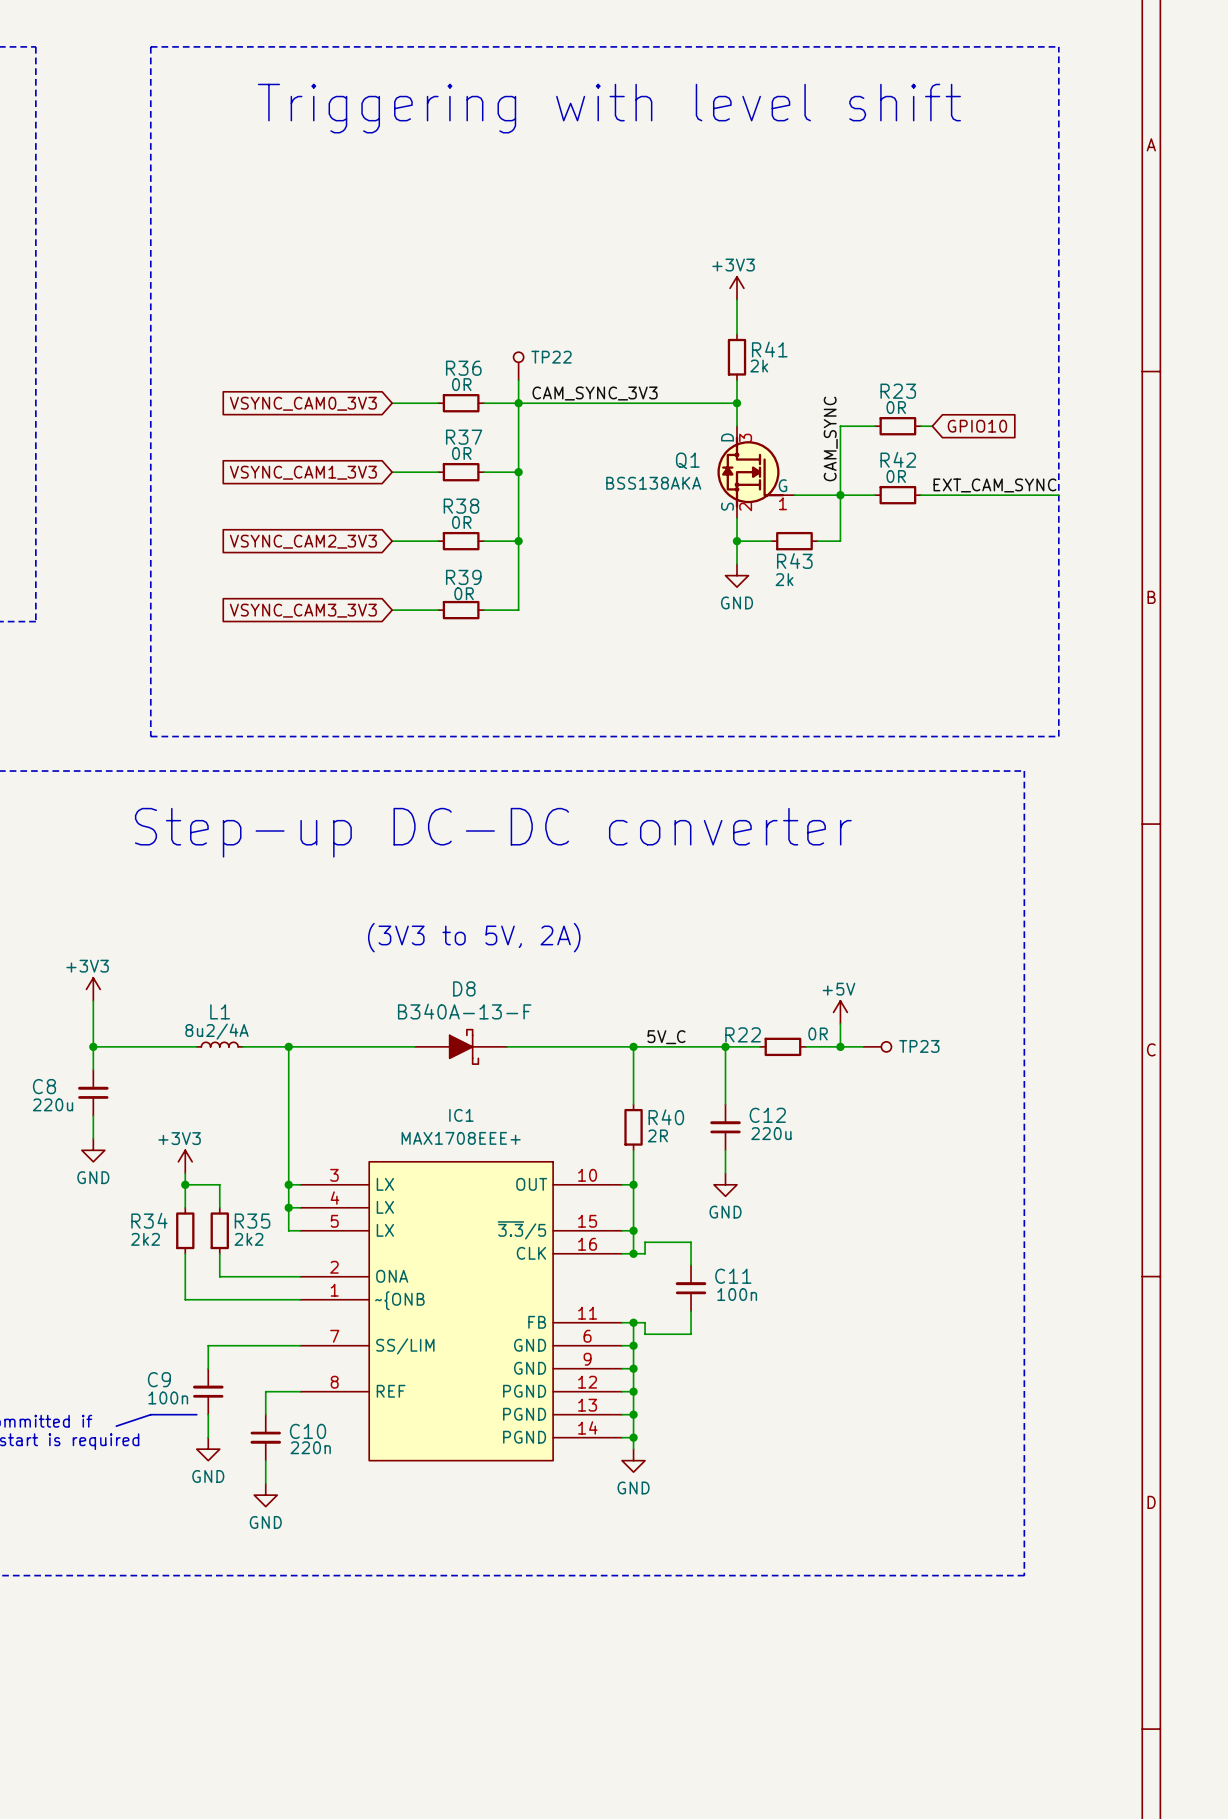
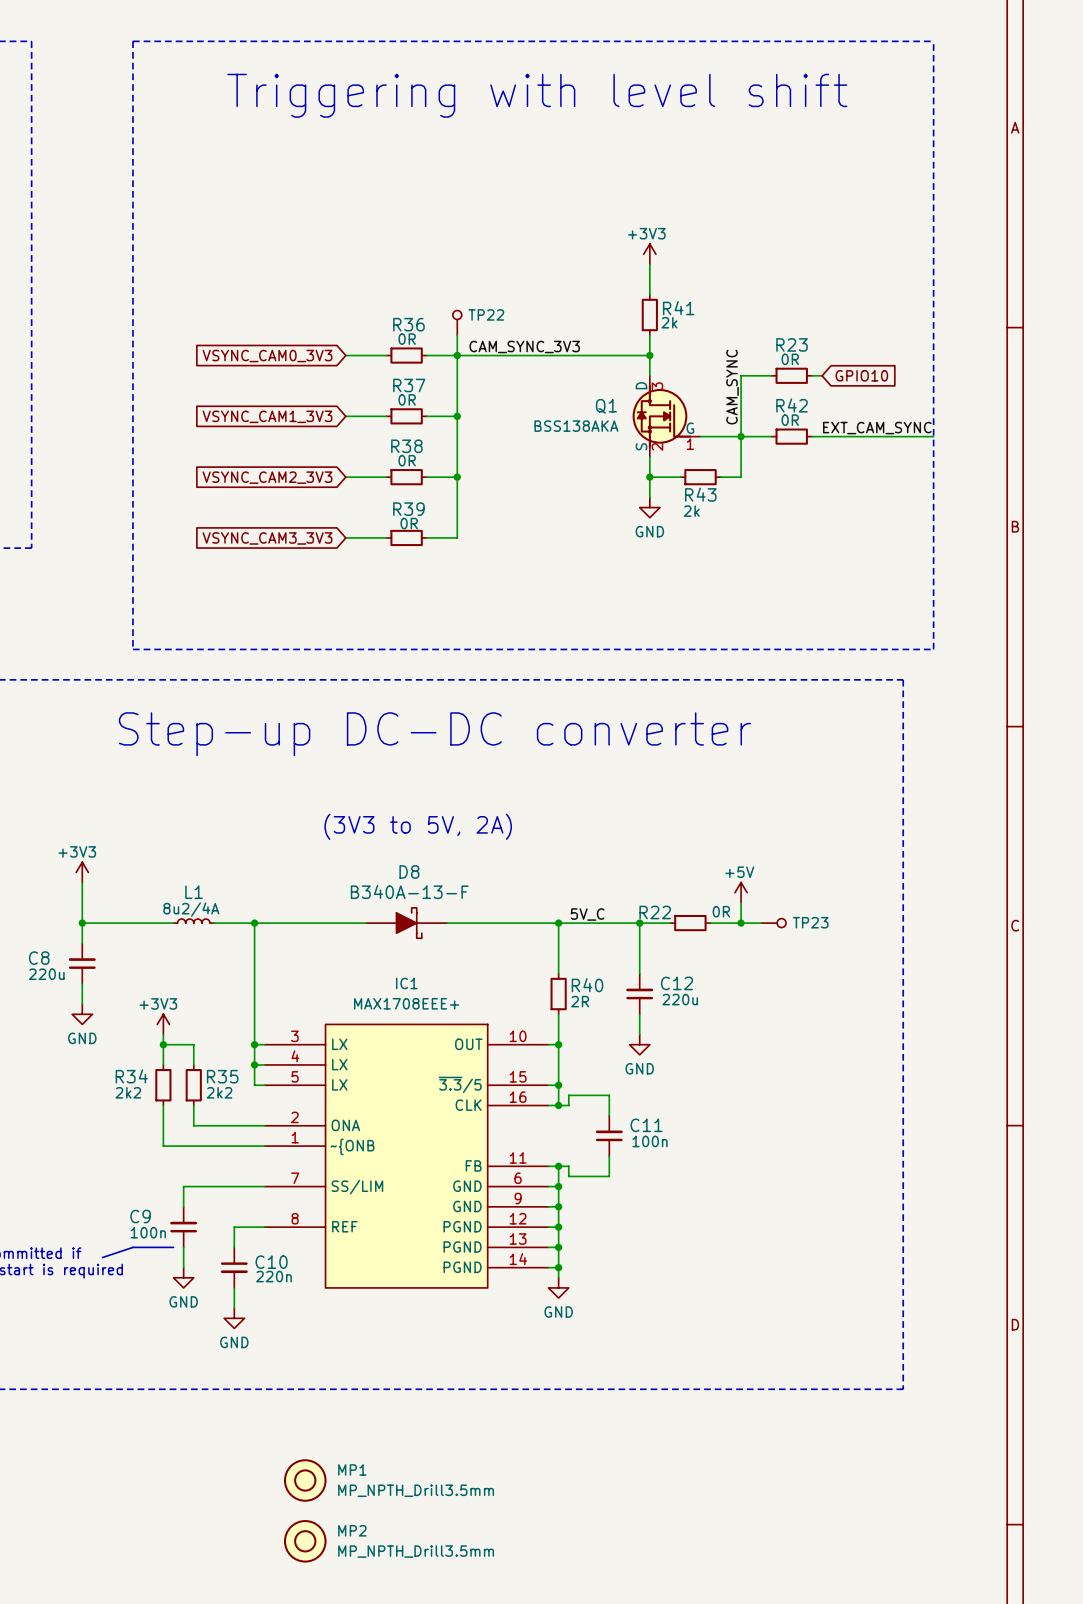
MP1: none -> MP_NPTH_Drill3.5mm (305, 1480)
MP2: none -> MP_NPTH_Drill3.5mm (305, 1541)

